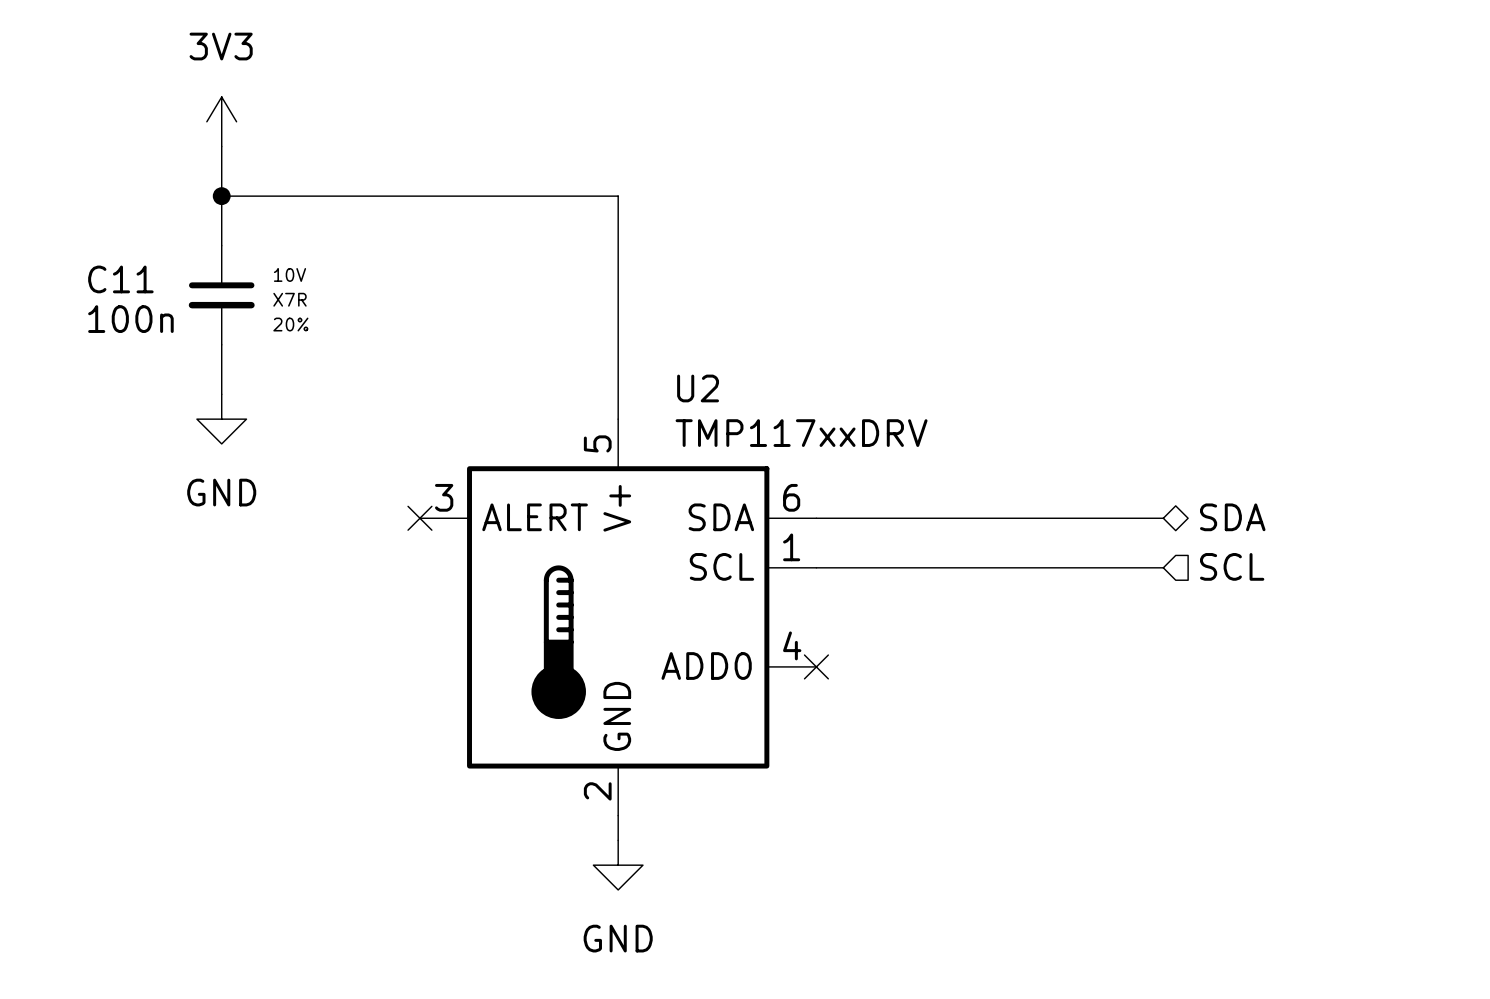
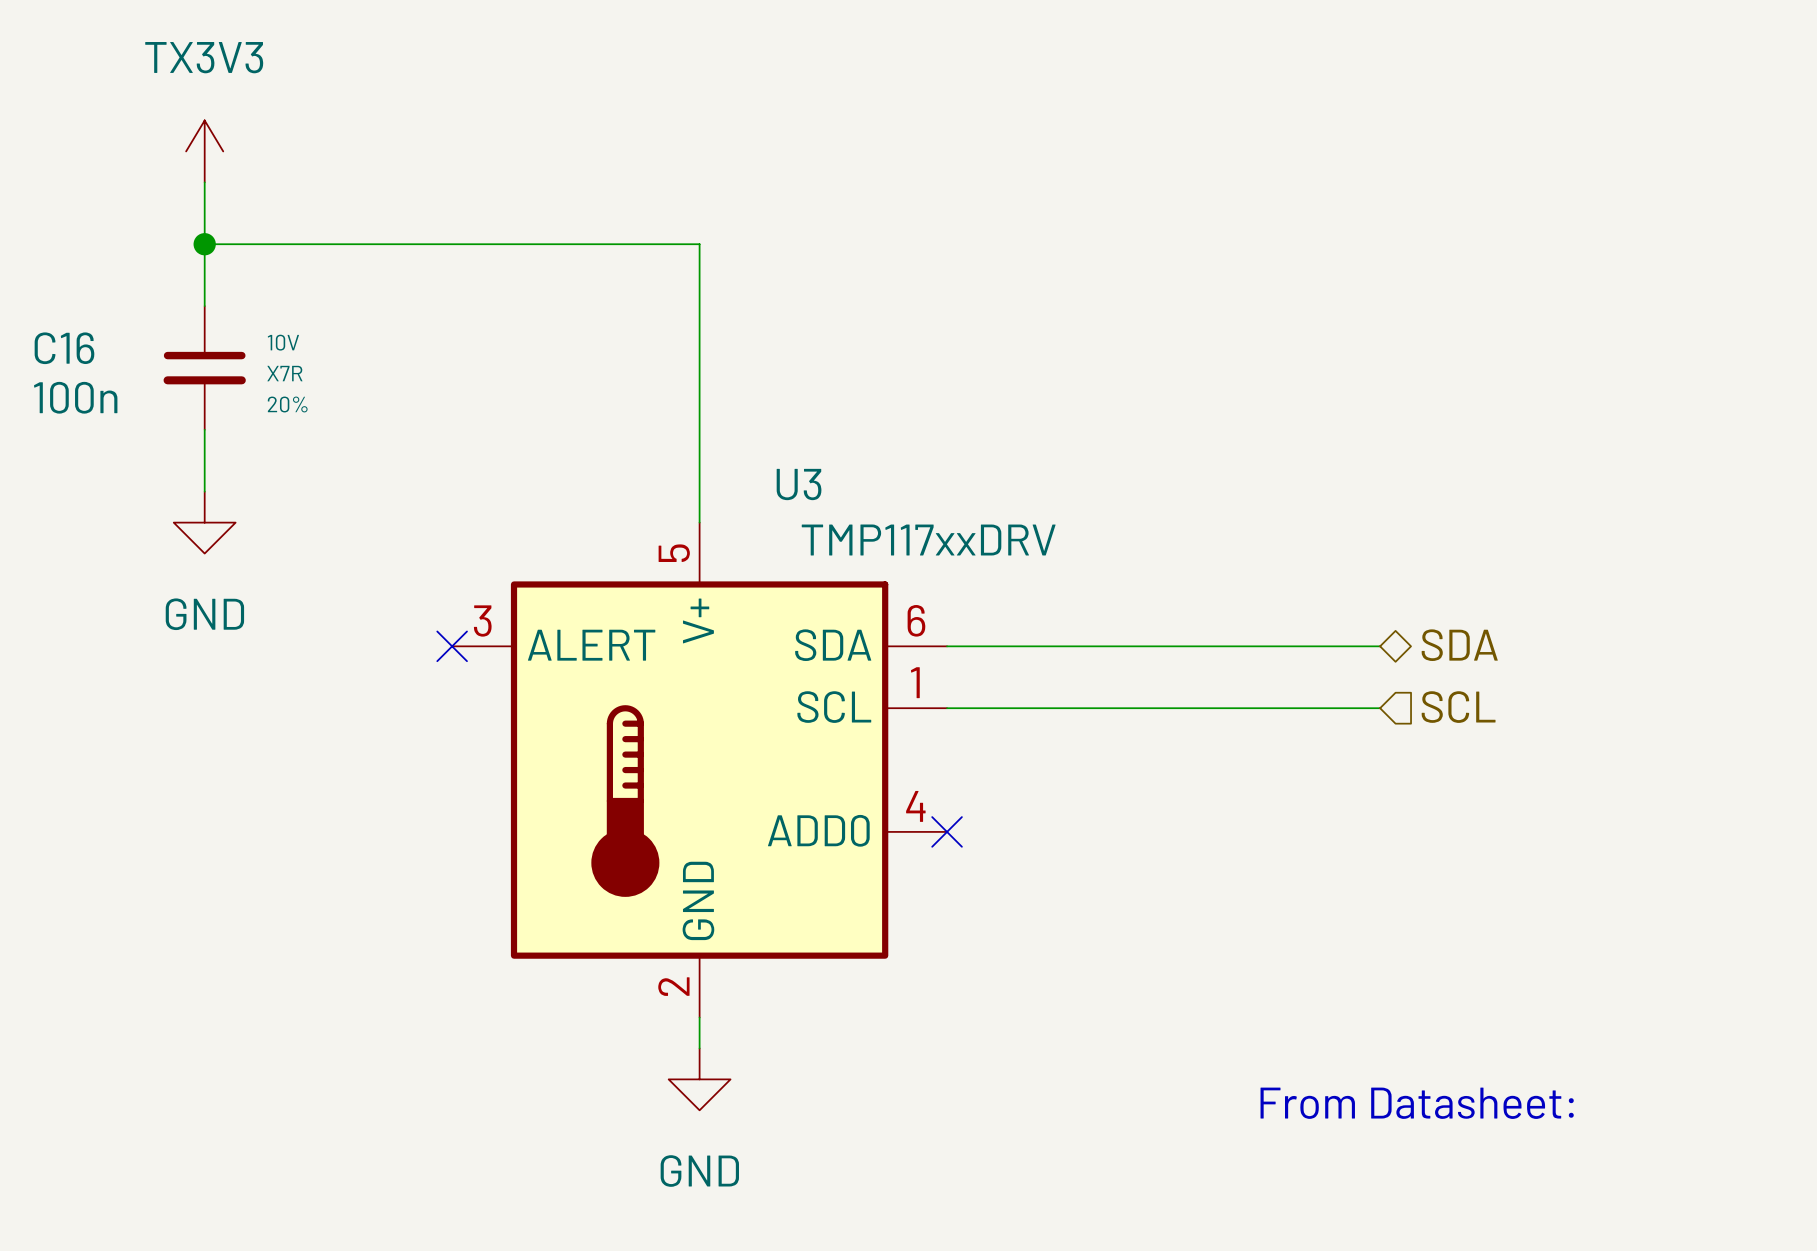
power symbol: 3V3 (221, 121) -> TX3V3 (204, 151)
C11 name: C11 (120, 279) -> C16 (64, 348)
U2 name: U2 (698, 388) -> U3 (799, 484)
text: none -> From Datasheet: (1417, 1103)

